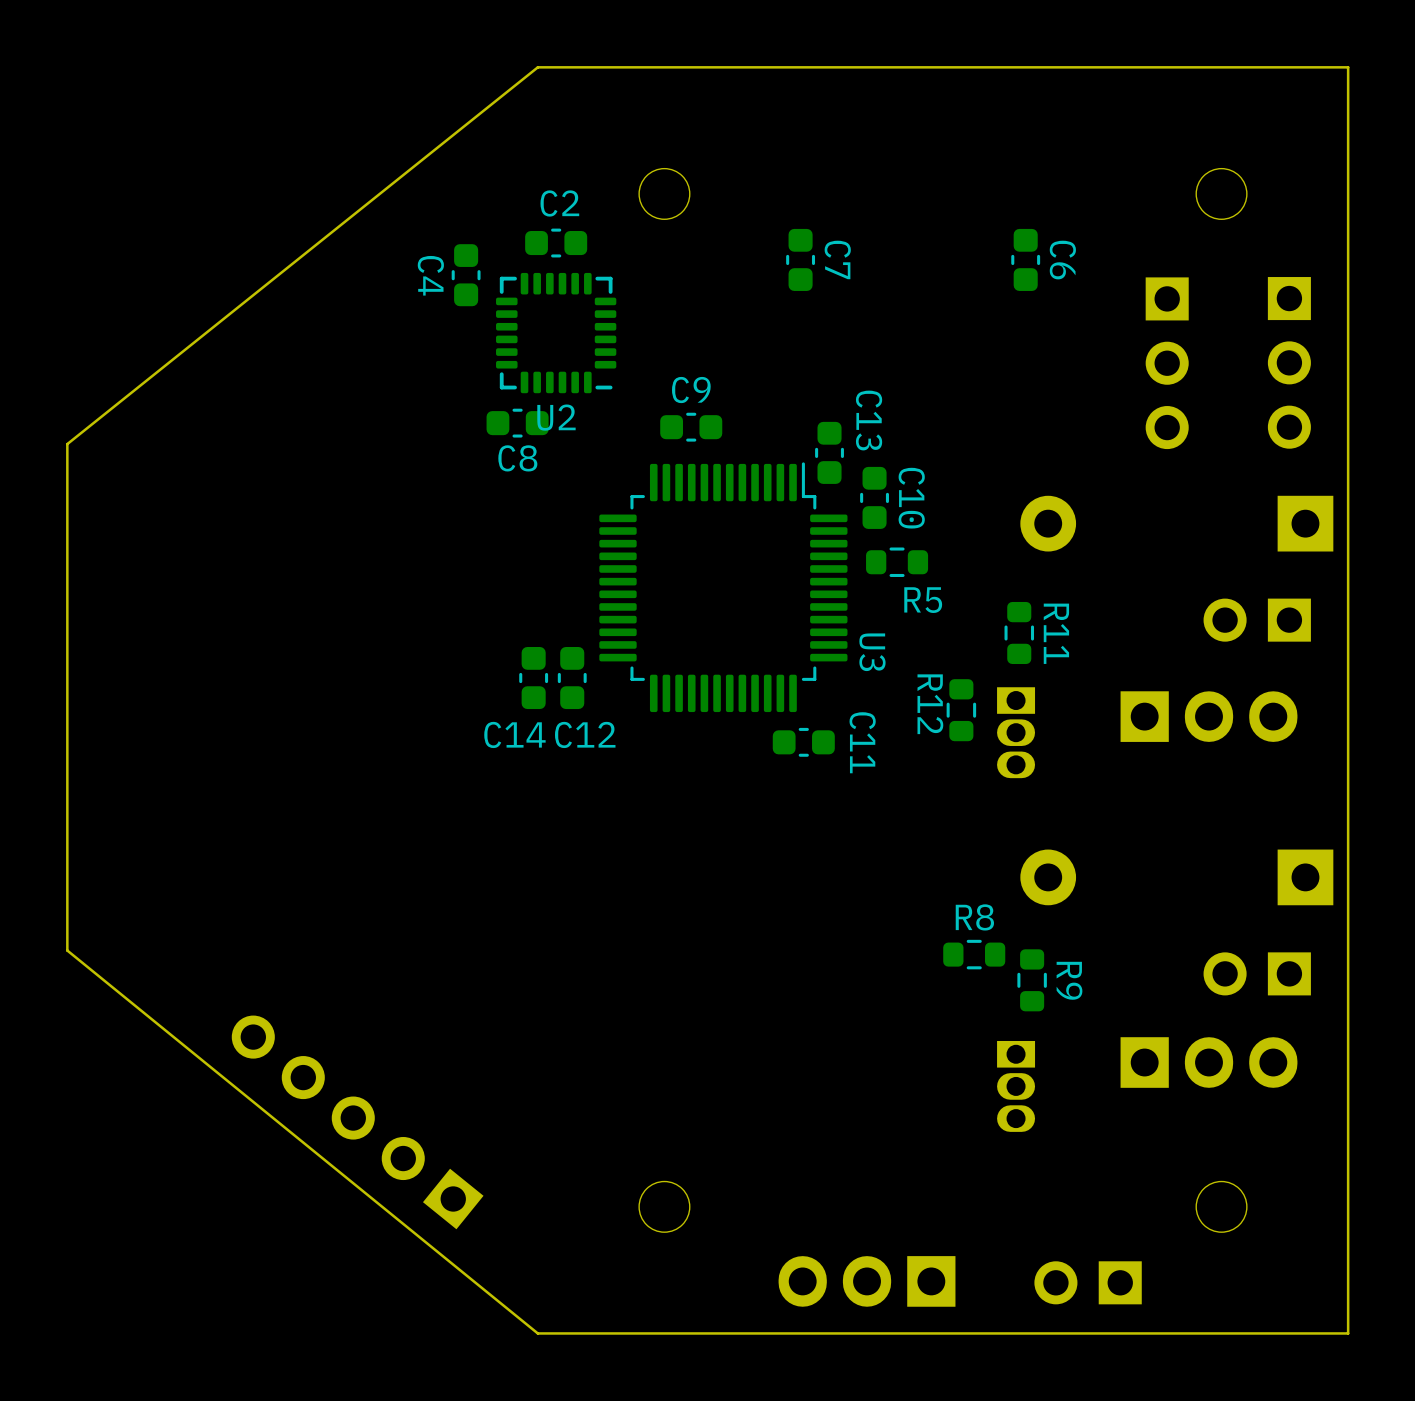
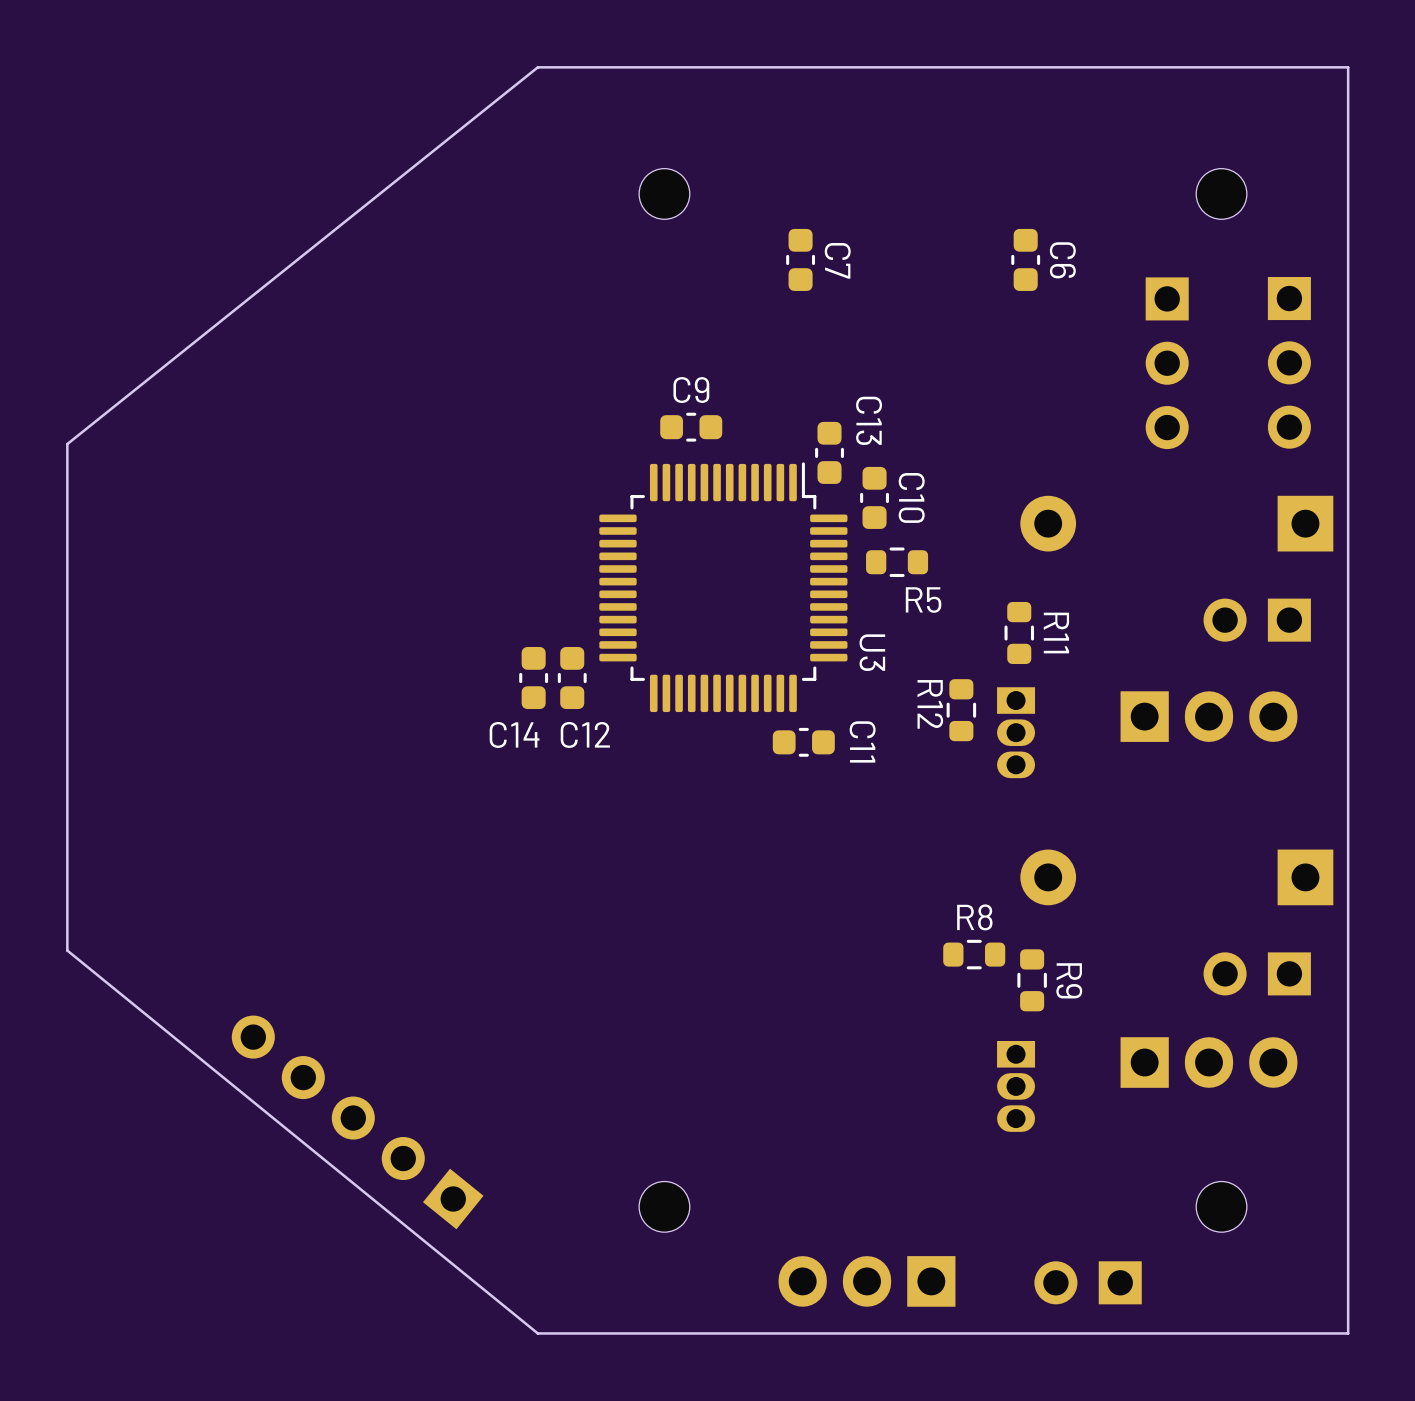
C2: (556, 243) -> none
C4: (466, 275) -> none
U2: (556, 333) -> none
C8: (517, 423) -> none

